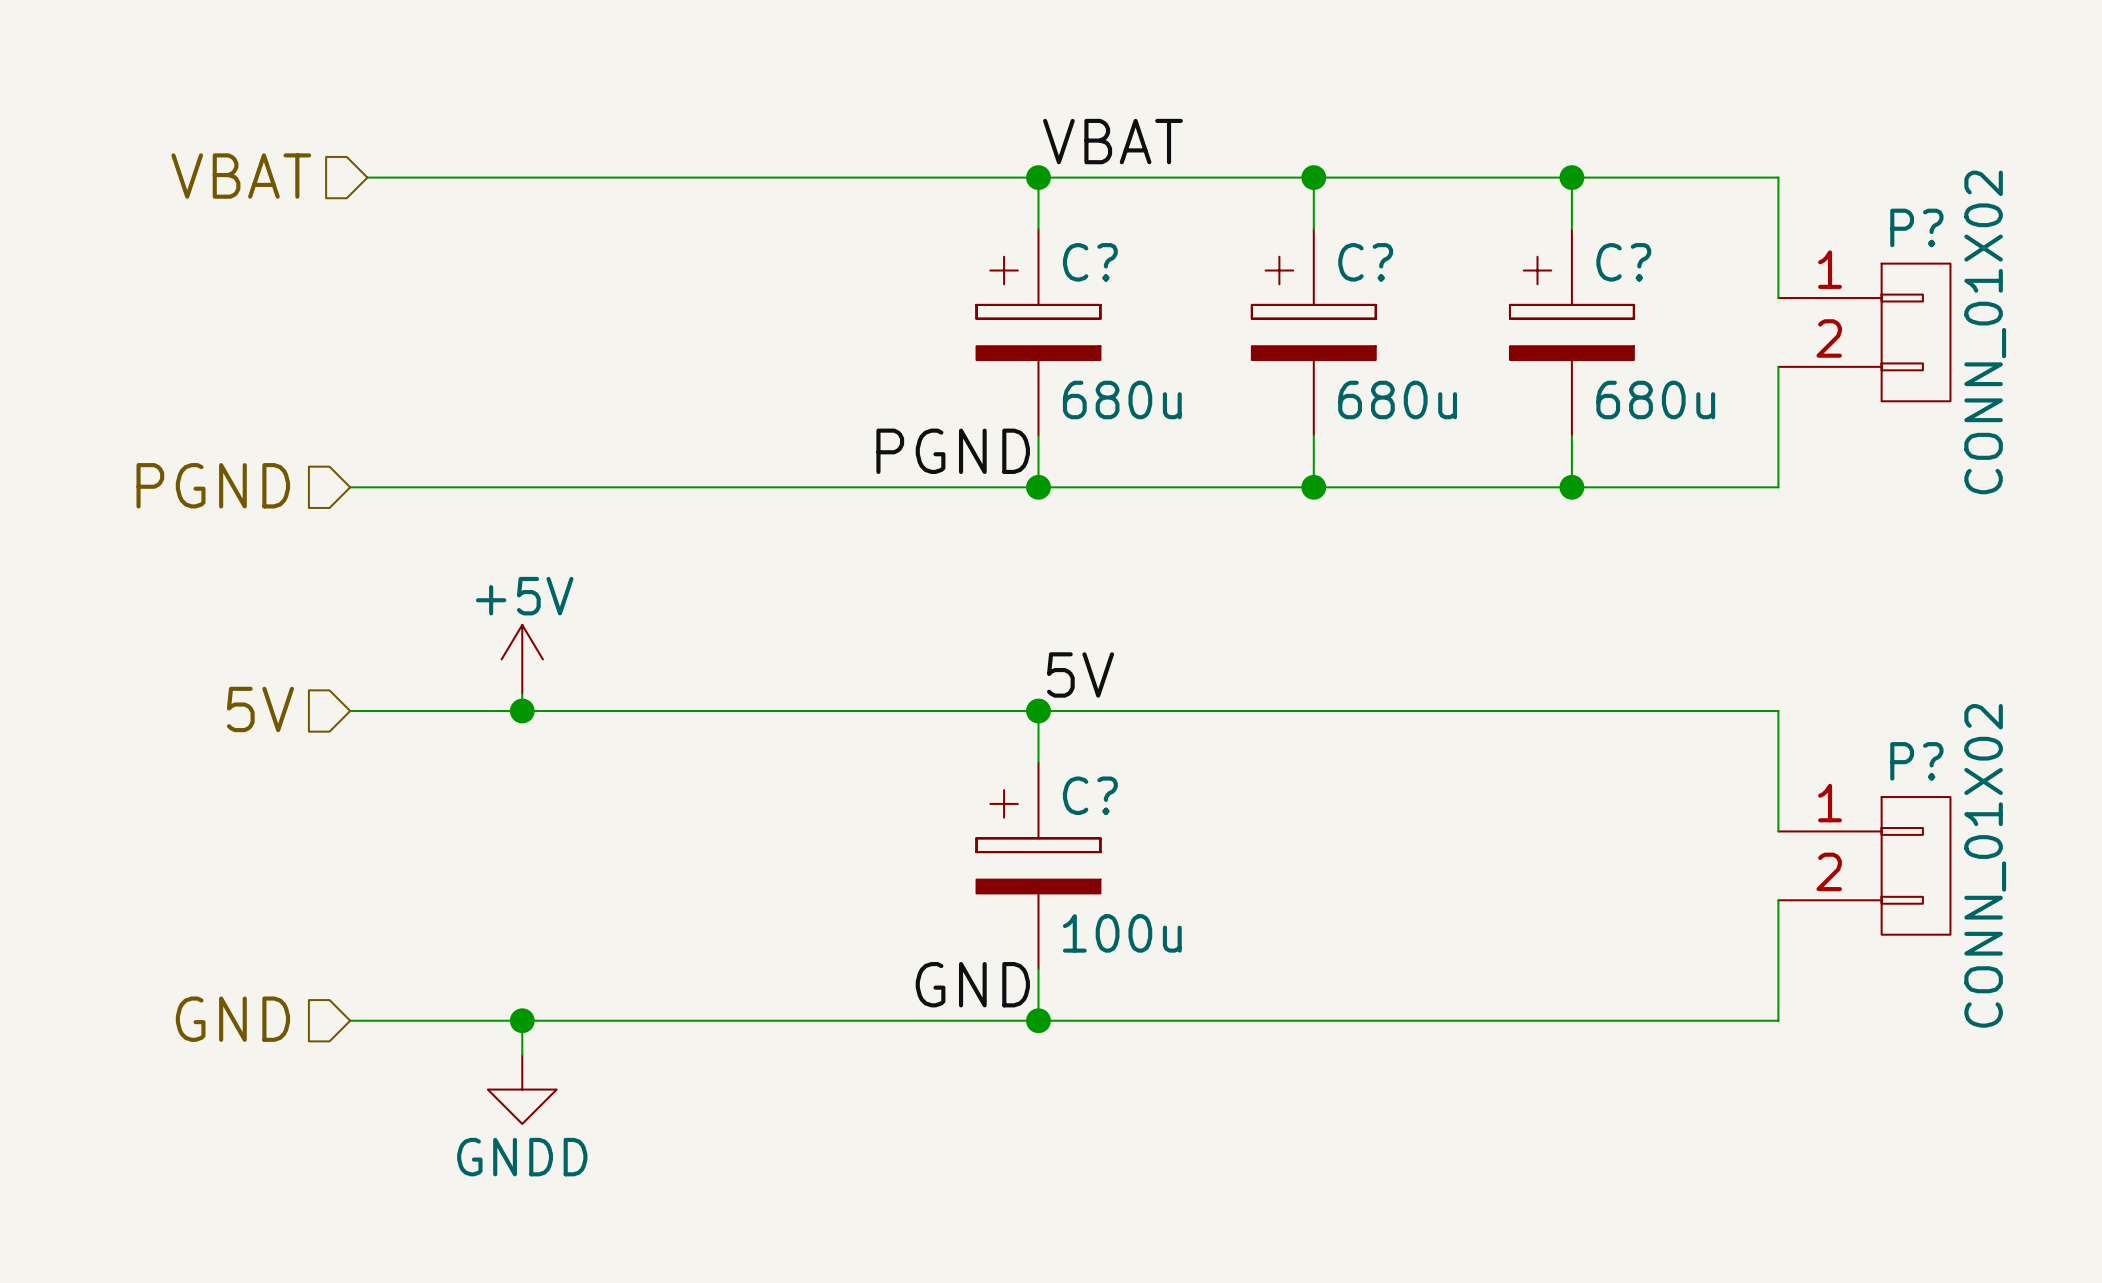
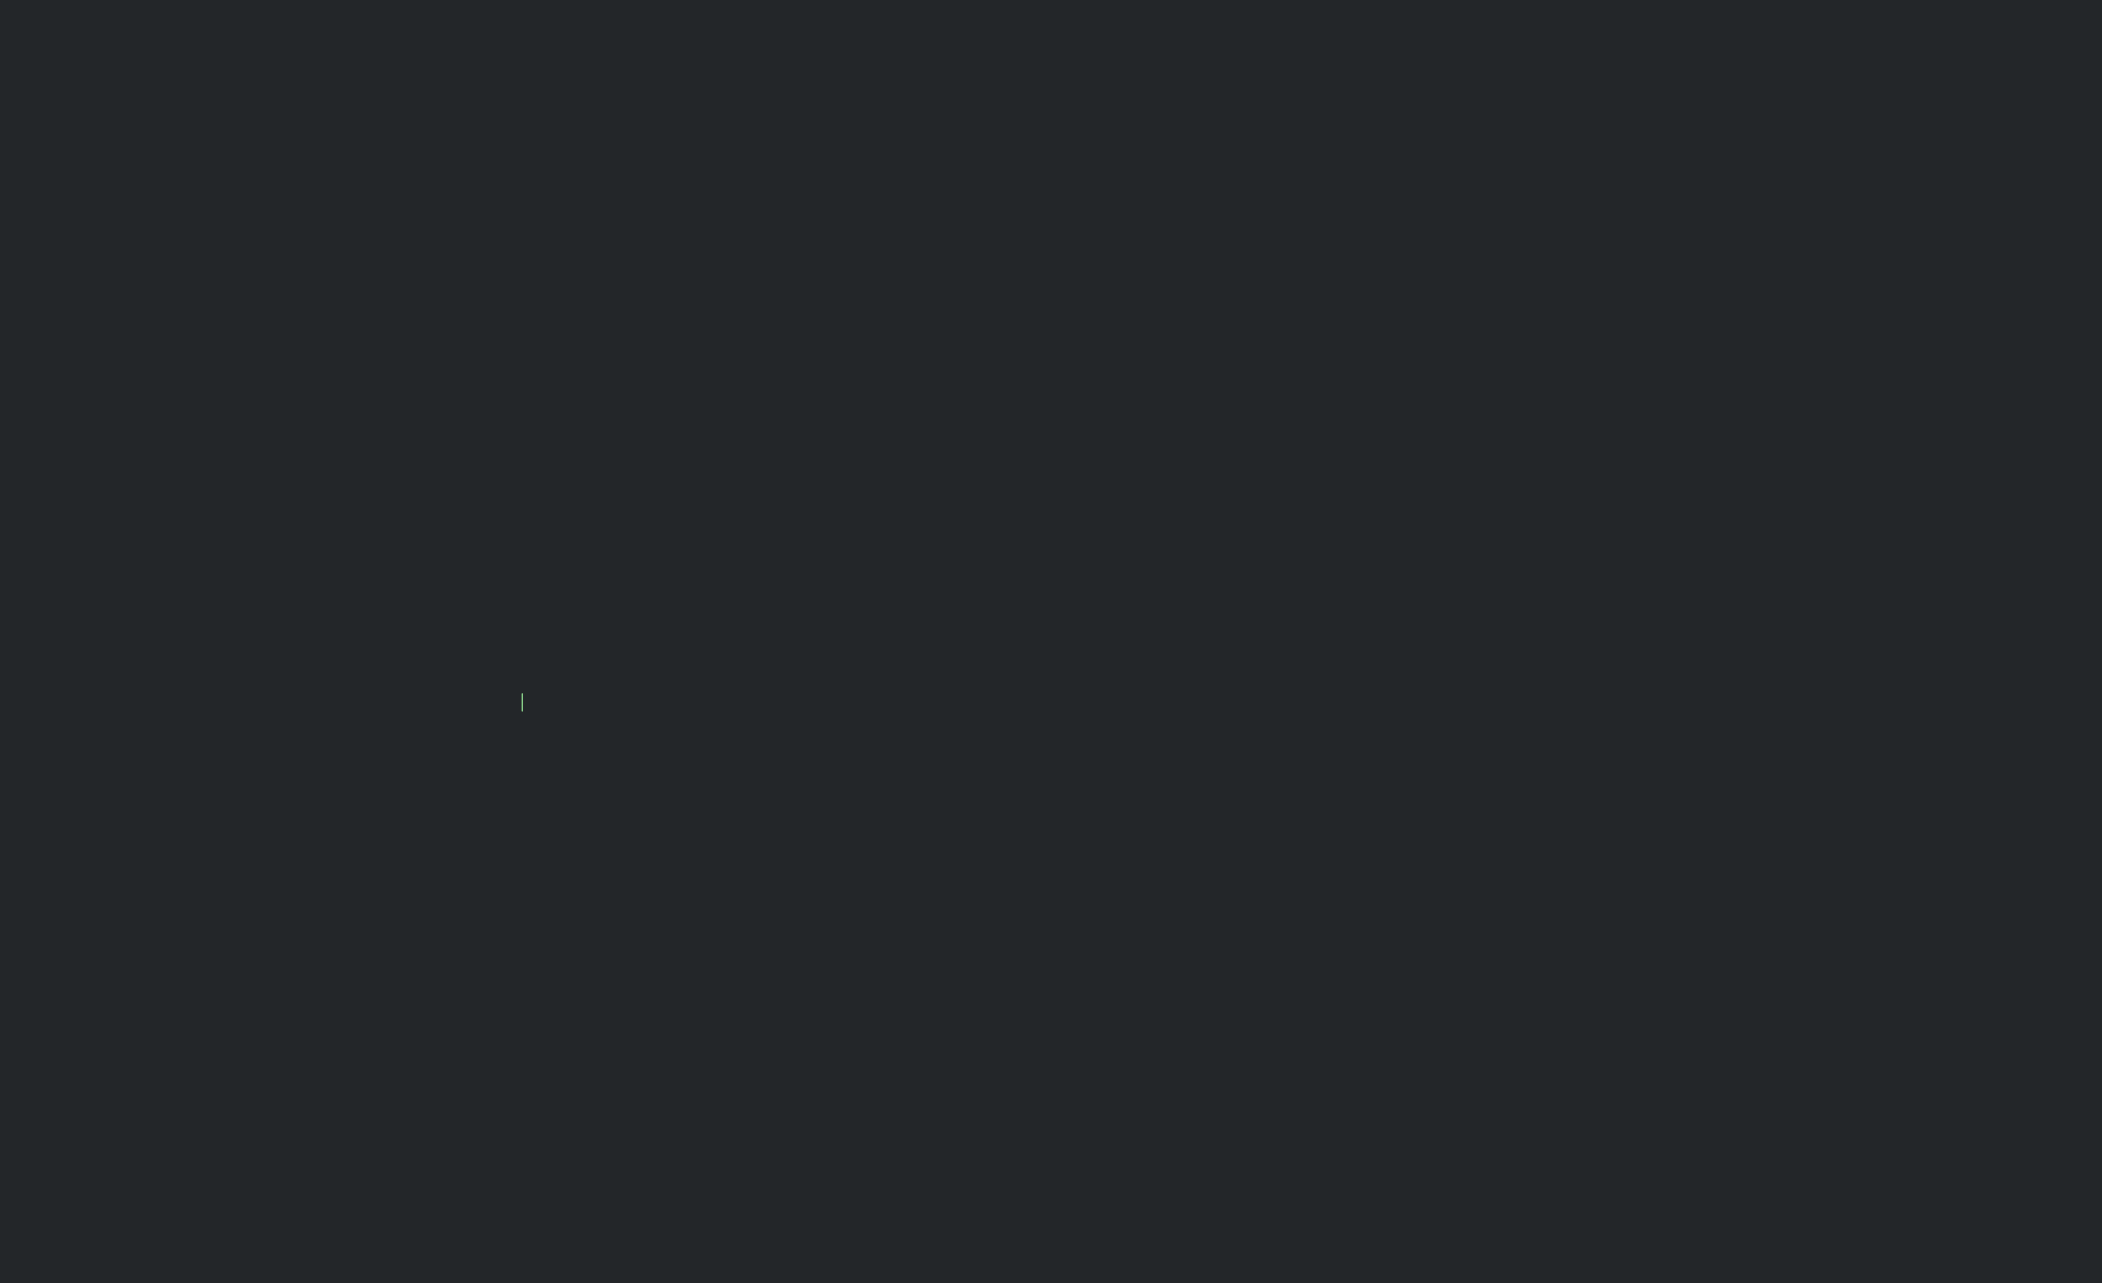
label: VBAT (1112, 141) -> none
hierarchical label: VBAT (241, 176) -> none
wire: (367, 177) (1778, 177) (1778, 298) -> none
wire: (1038, 177) (1038, 229) -> none
junction: (1038, 177) -> none
wire: (1313, 177) (1313, 229) -> none
junction: (1313, 177) -> none
wire: (1571, 177) (1571, 229) -> none
junction: (1571, 177) -> none
C?: 680u (1038, 332) -> none
C?: 680u (1313, 332) -> none
C?: 680u (1571, 332) -> none
P?: CONN_01X02 (1864, 332) -> none
wire: (1778, 366) (1778, 487) (350, 487) -> none
wire: (1038, 435) (1038, 487) -> none
wire: (1313, 435) (1313, 487) -> none
wire: (1571, 435) (1571, 487) -> none
label: PGND (953, 451) -> none
hierarchical label: PGND (213, 485) -> none
junction: (1038, 487) -> none
junction: (1313, 487) -> none
junction: (1571, 487) -> none
power symbol: +5V (522, 659) -> none
label: 5V (1080, 674) -> none
hierarchical label: 5V (260, 709) -> none
wire: (350, 711) (1778, 711) (1778, 831) -> none
junction: (522, 711) -> none
wire: (1038, 711) (1038, 762) -> none
junction: (1038, 711) -> none
C?: 100u (1038, 865) -> none
P?: CONN_01X02 (1864, 865) -> none
wire: (1778, 900) (1778, 1020) (350, 1020) -> none
wire: (1038, 969) (1038, 1020) -> none
label: GND (972, 984) -> none
hierarchical label: GND (232, 1019) -> none
wire: (522, 1020) (522, 1055) -> none
junction: (522, 1020) -> none
junction: (1038, 1020) -> none
power symbol: GNDD (522, 1089) -> none

